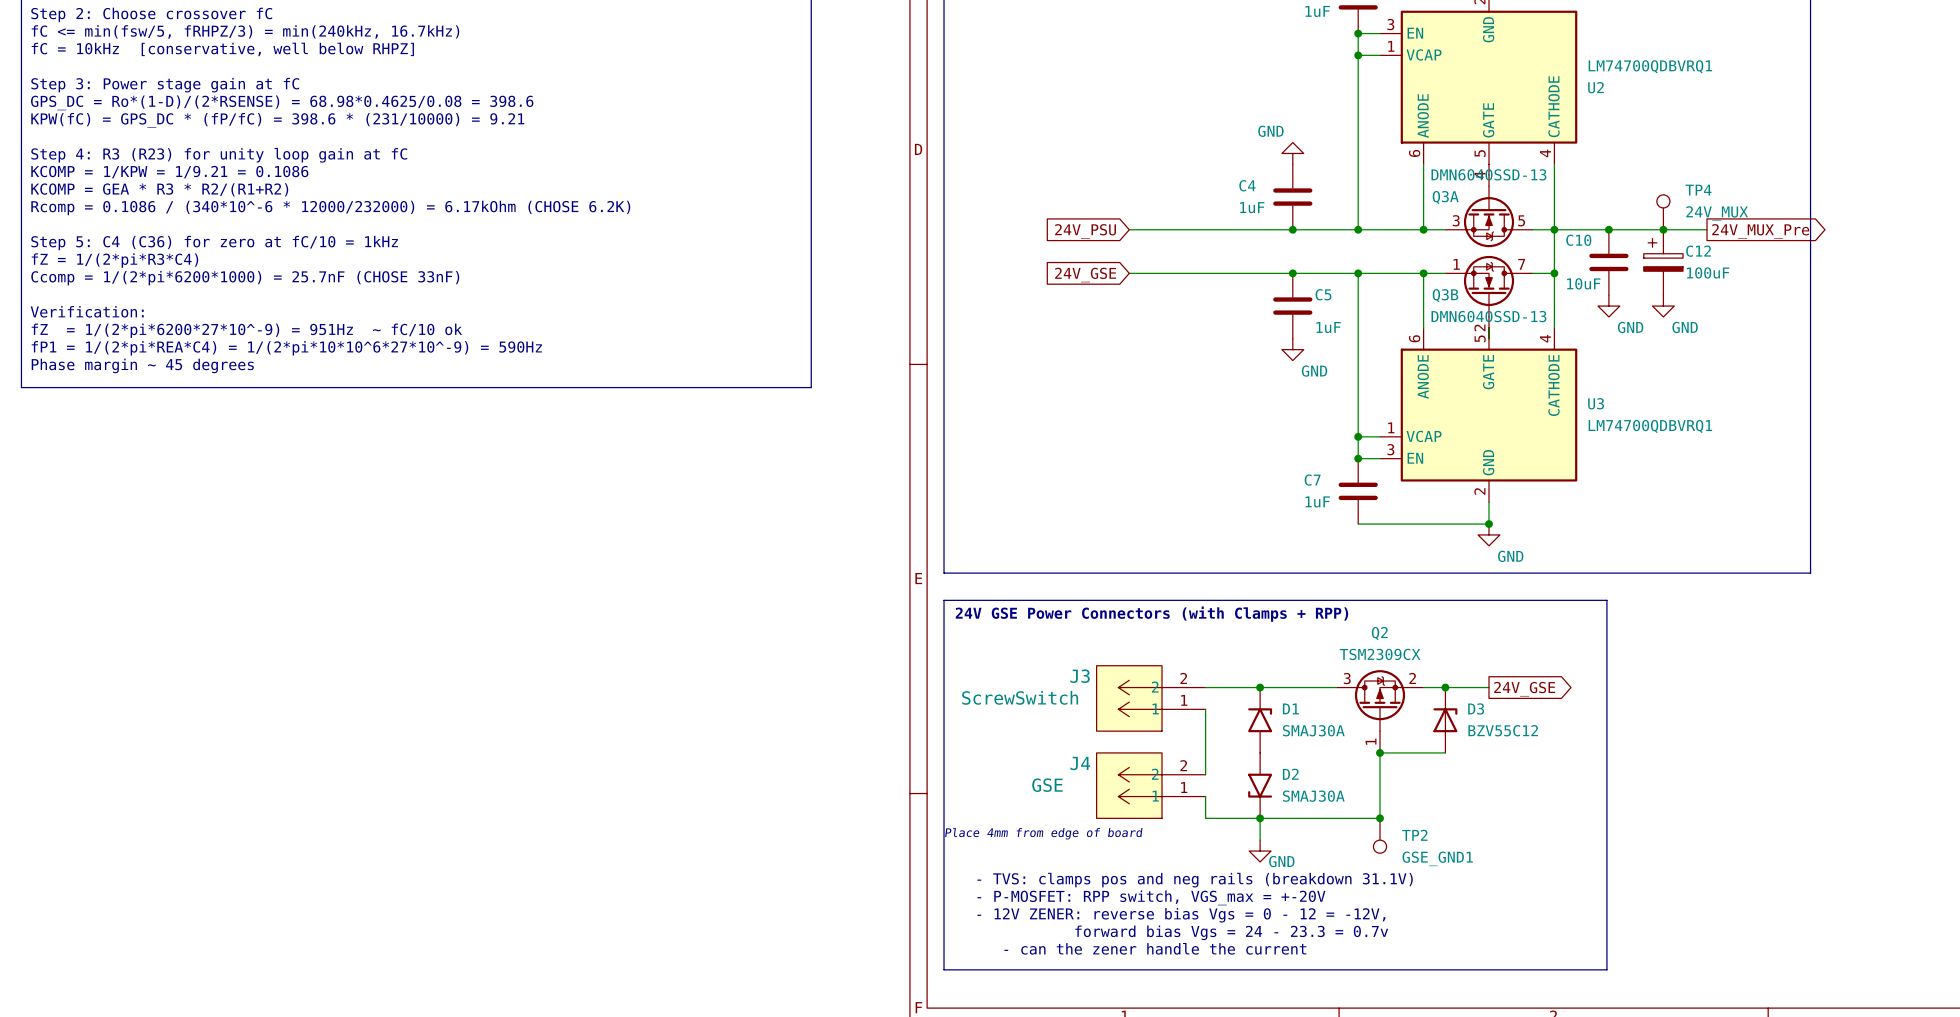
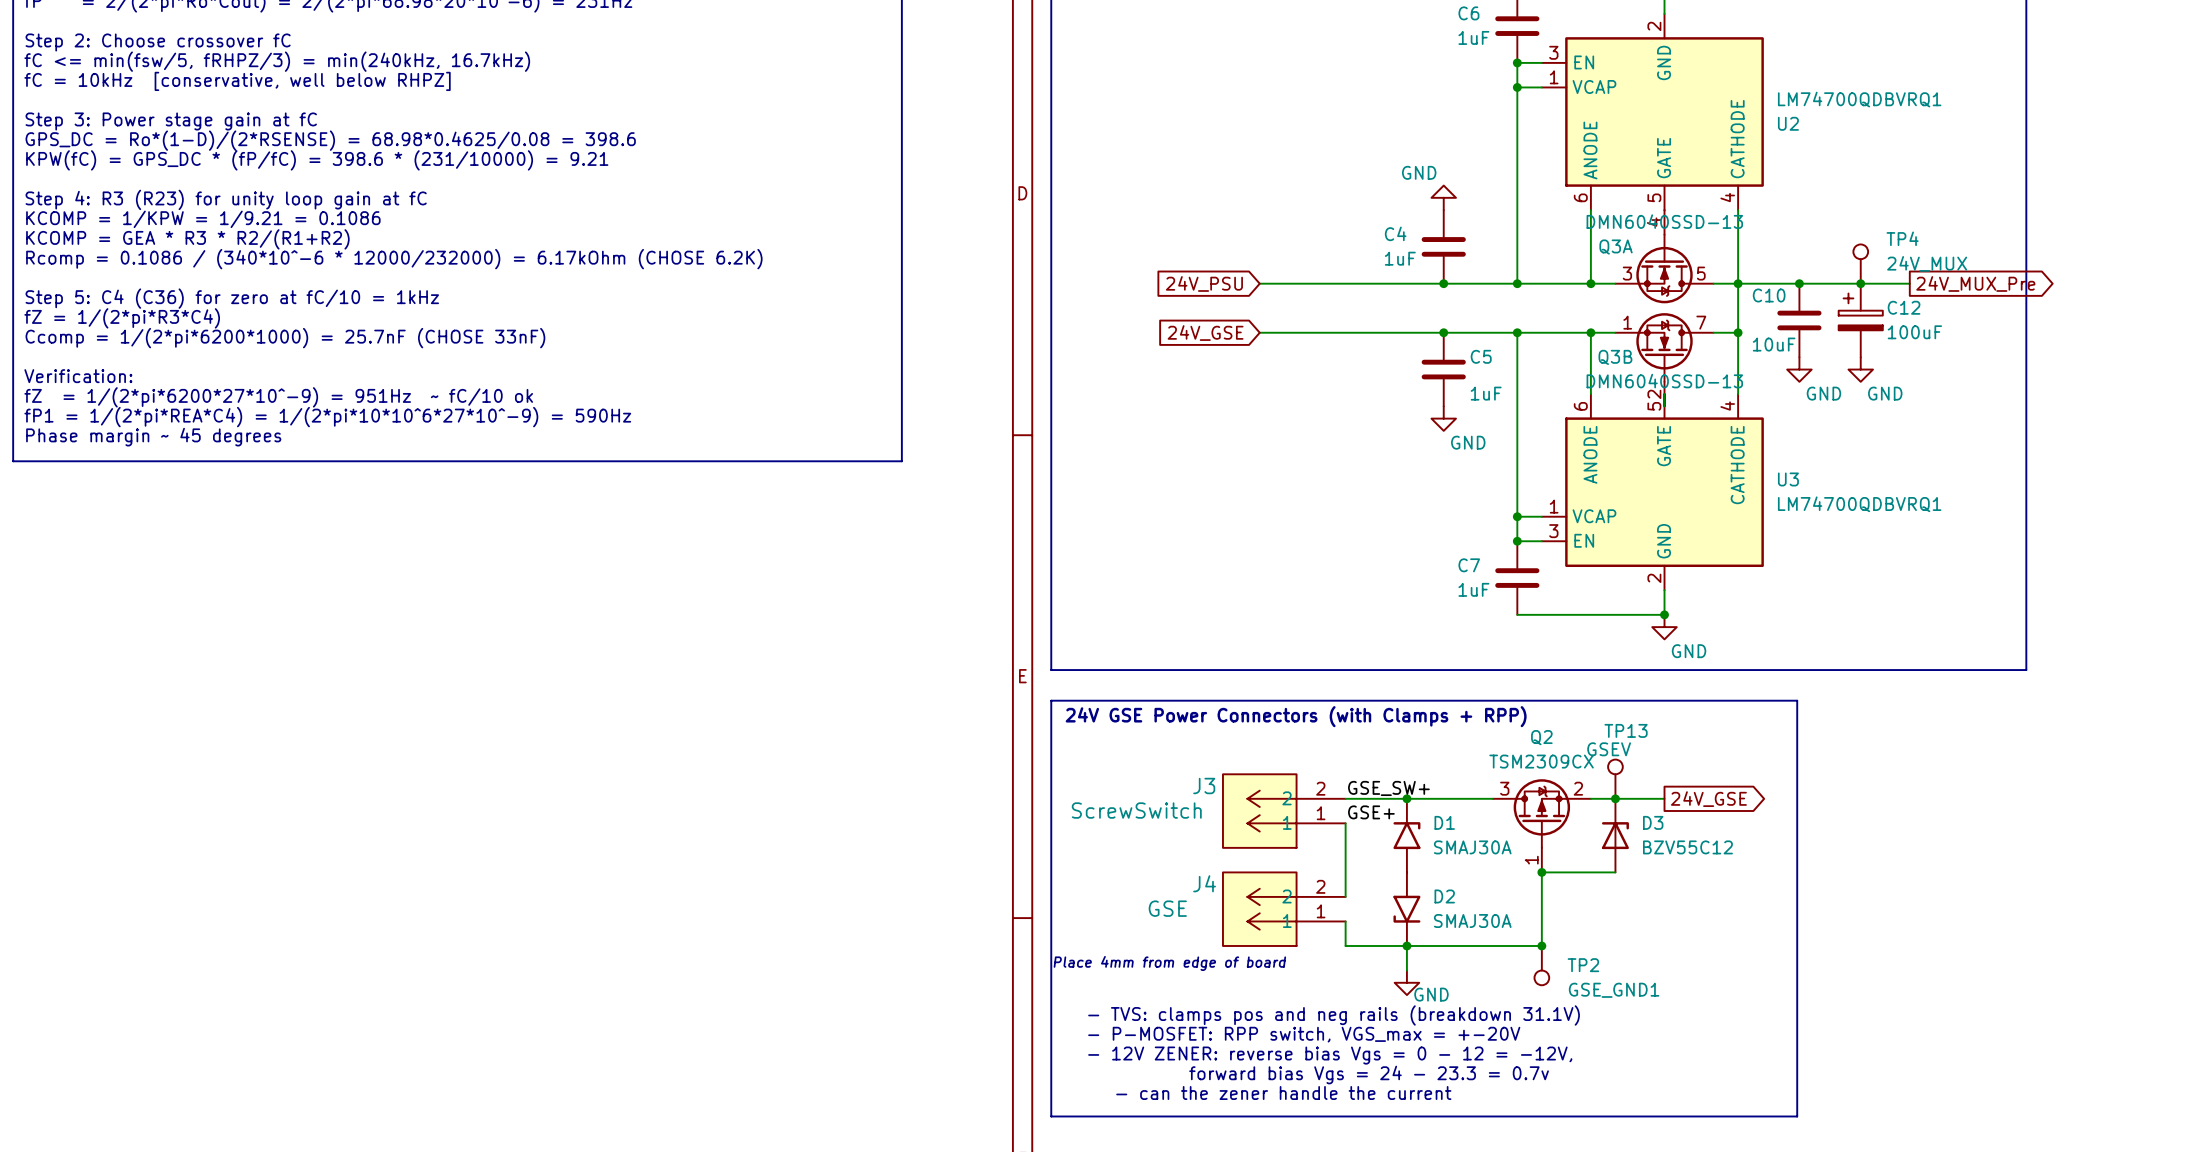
TP13: none -> GSEV (1615, 779)
label: none -> GSE_SW+ (1388, 788)
label: none -> GSE+ (1371, 812)

